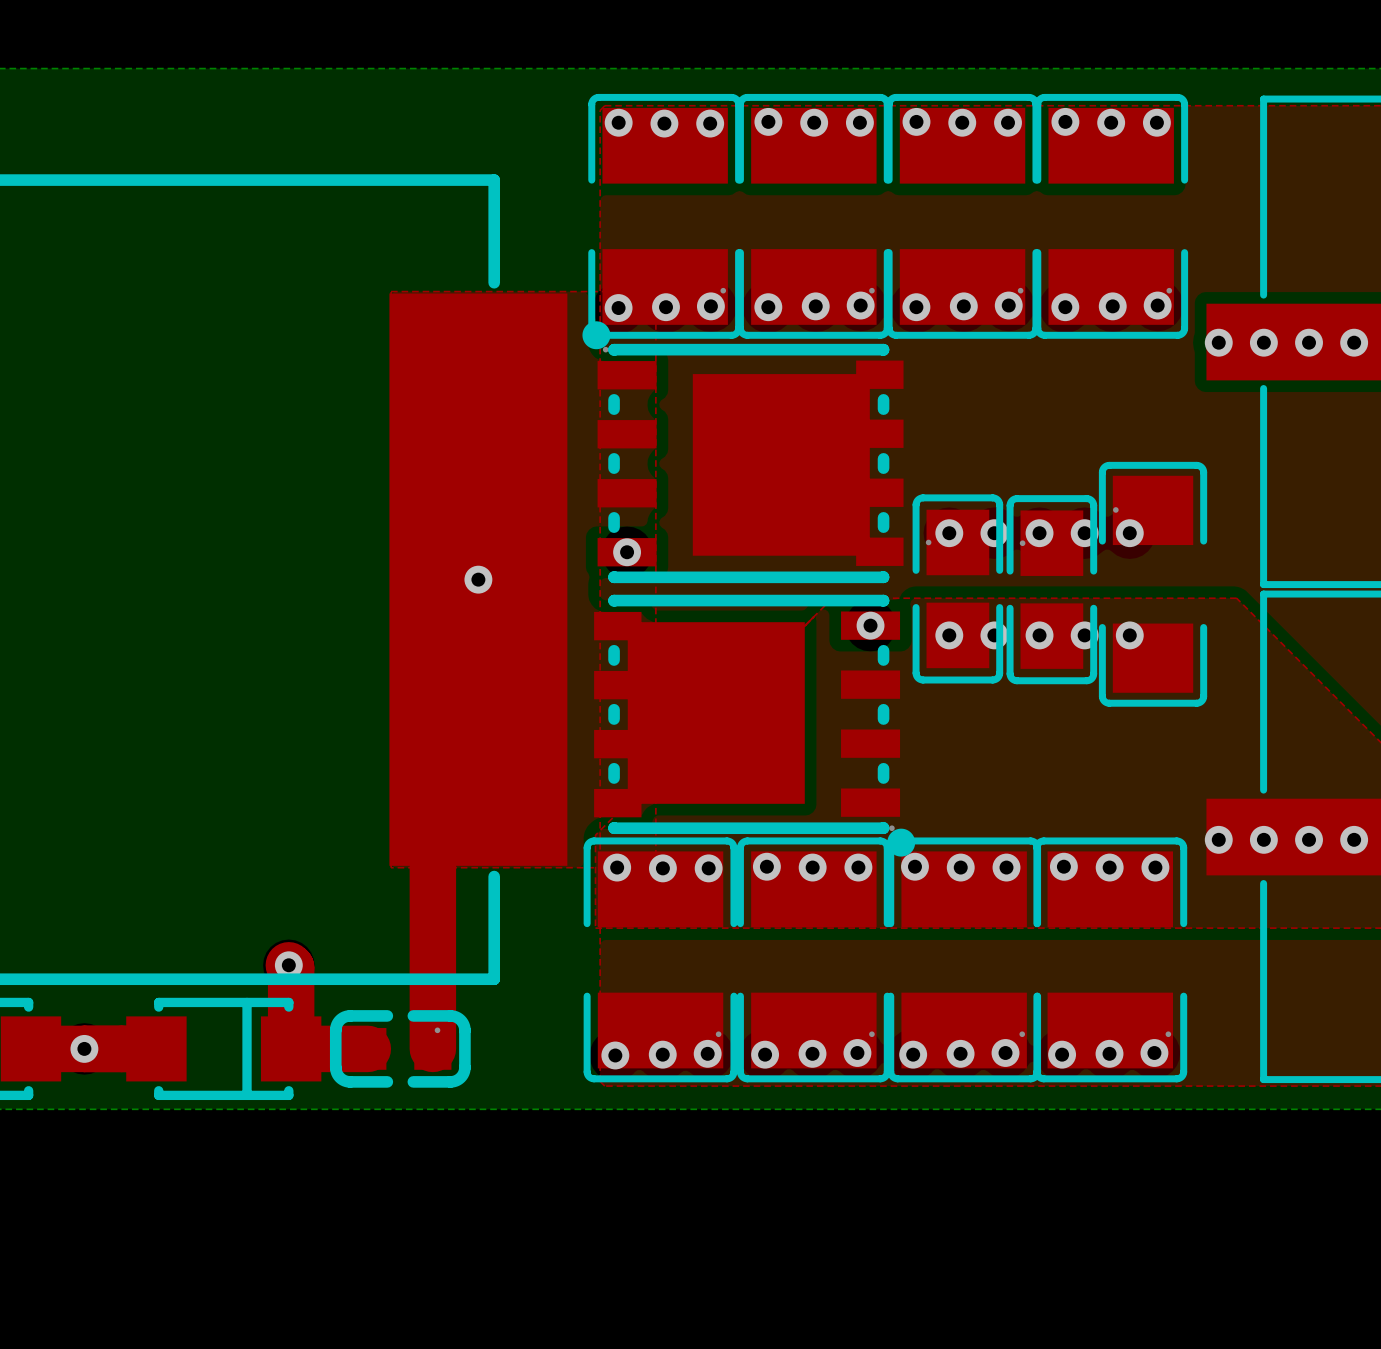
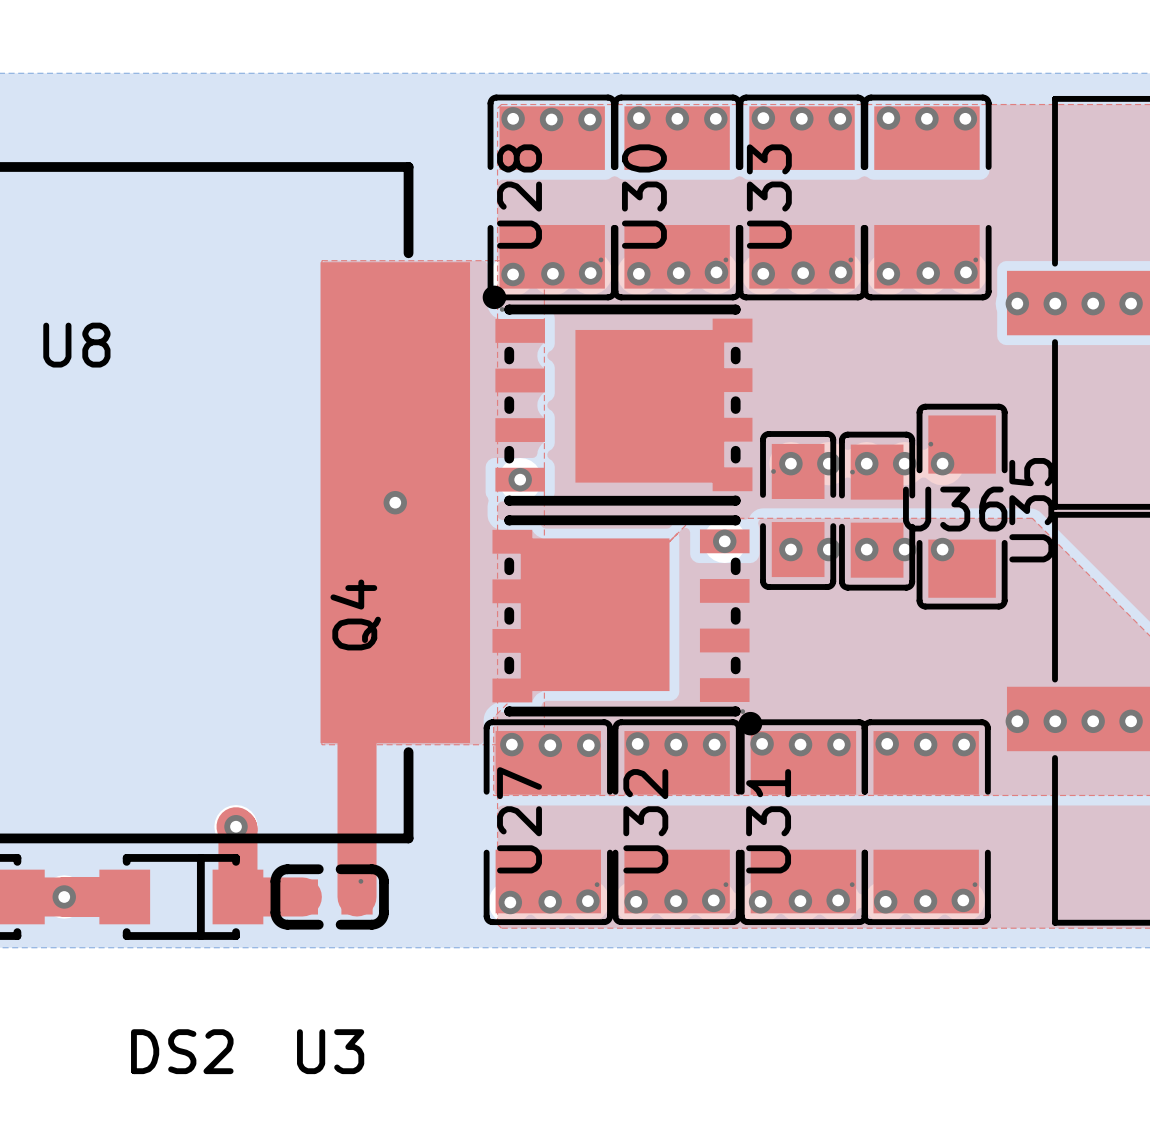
U28 name: none -> U28 (519, 196)
U30 name: none -> U30 (644, 196)
U33 name: none -> U33 (769, 196)
U8 name: none -> U8 (76, 345)
U36 name: none -> U36 (955, 509)
U35 name: none -> U35 (1031, 510)
Q4 name: none -> Q4 (355, 614)
U27 name: none -> U27 (519, 820)
U32 name: none -> U32 (645, 821)
U31 name: none -> U31 (768, 821)
DS2 name: none -> DS2 (182, 1051)
U3 name: none -> U3 (330, 1051)

